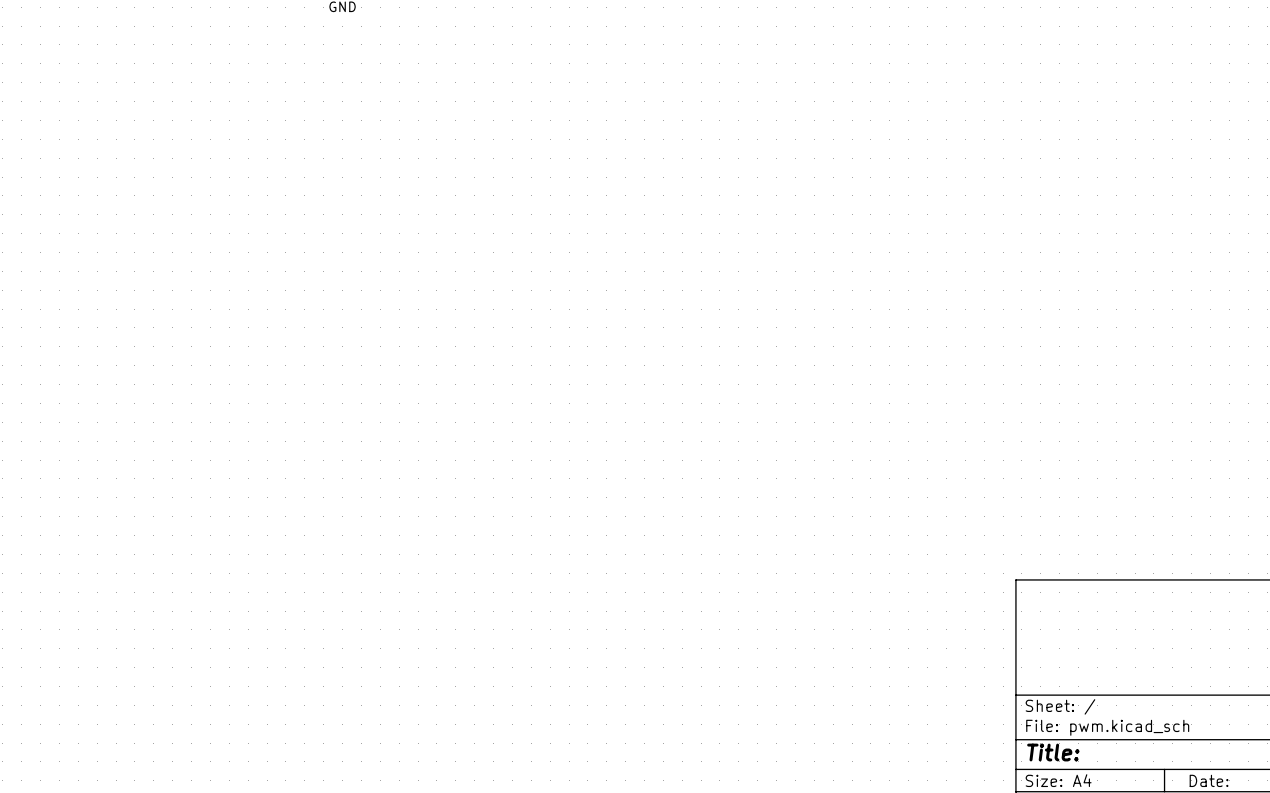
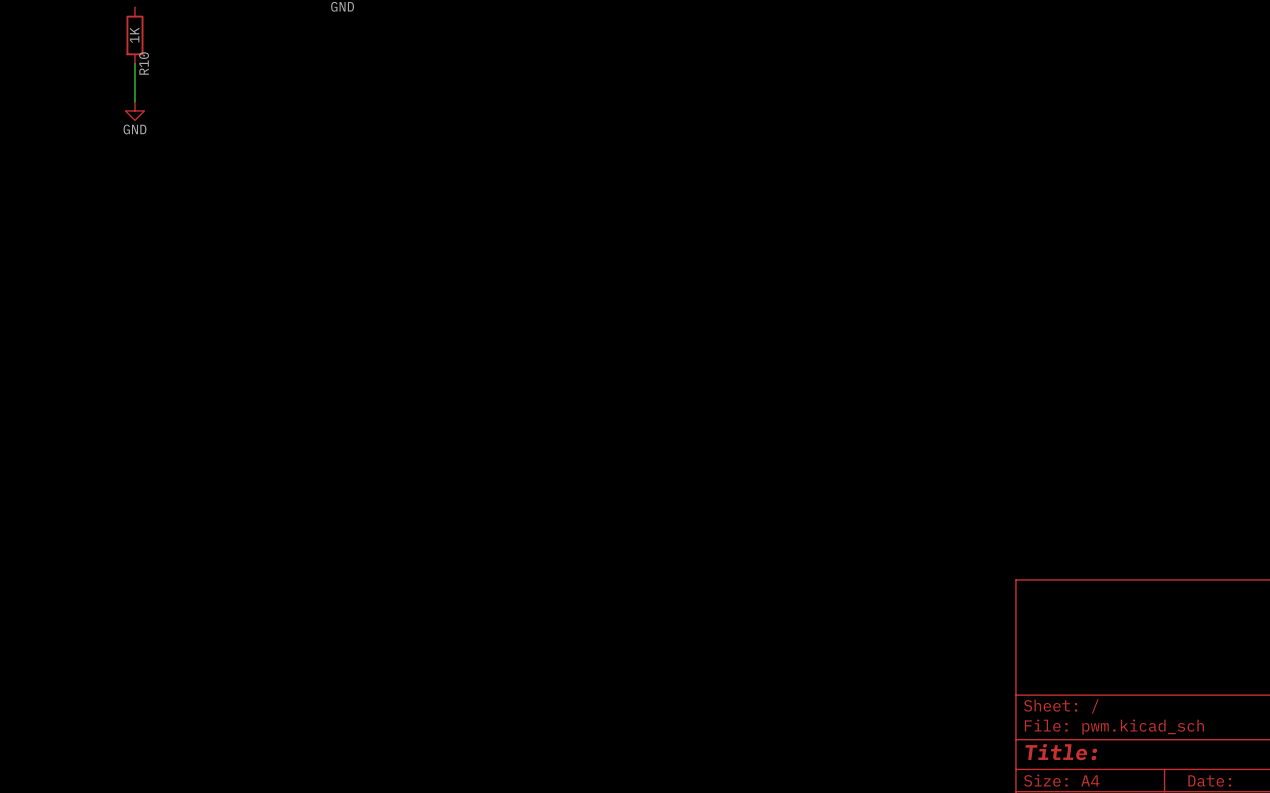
R10: none -> 1K (134, 35)
wire: none -> (134, 63) (134, 101)
power symbol: none -> GND (134, 110)

